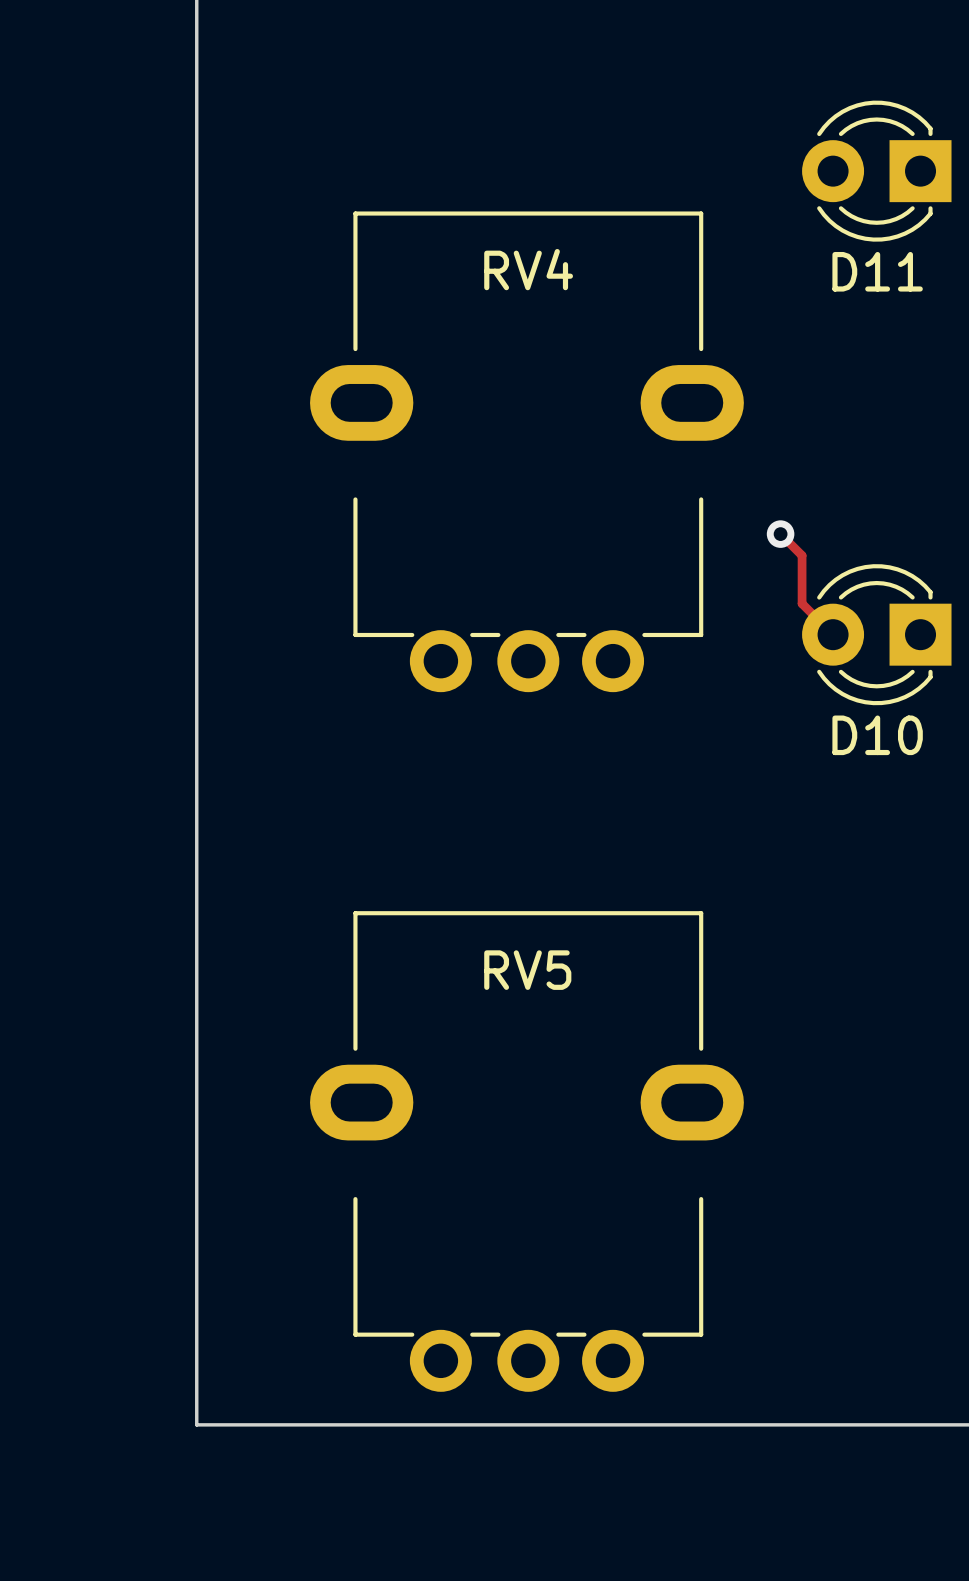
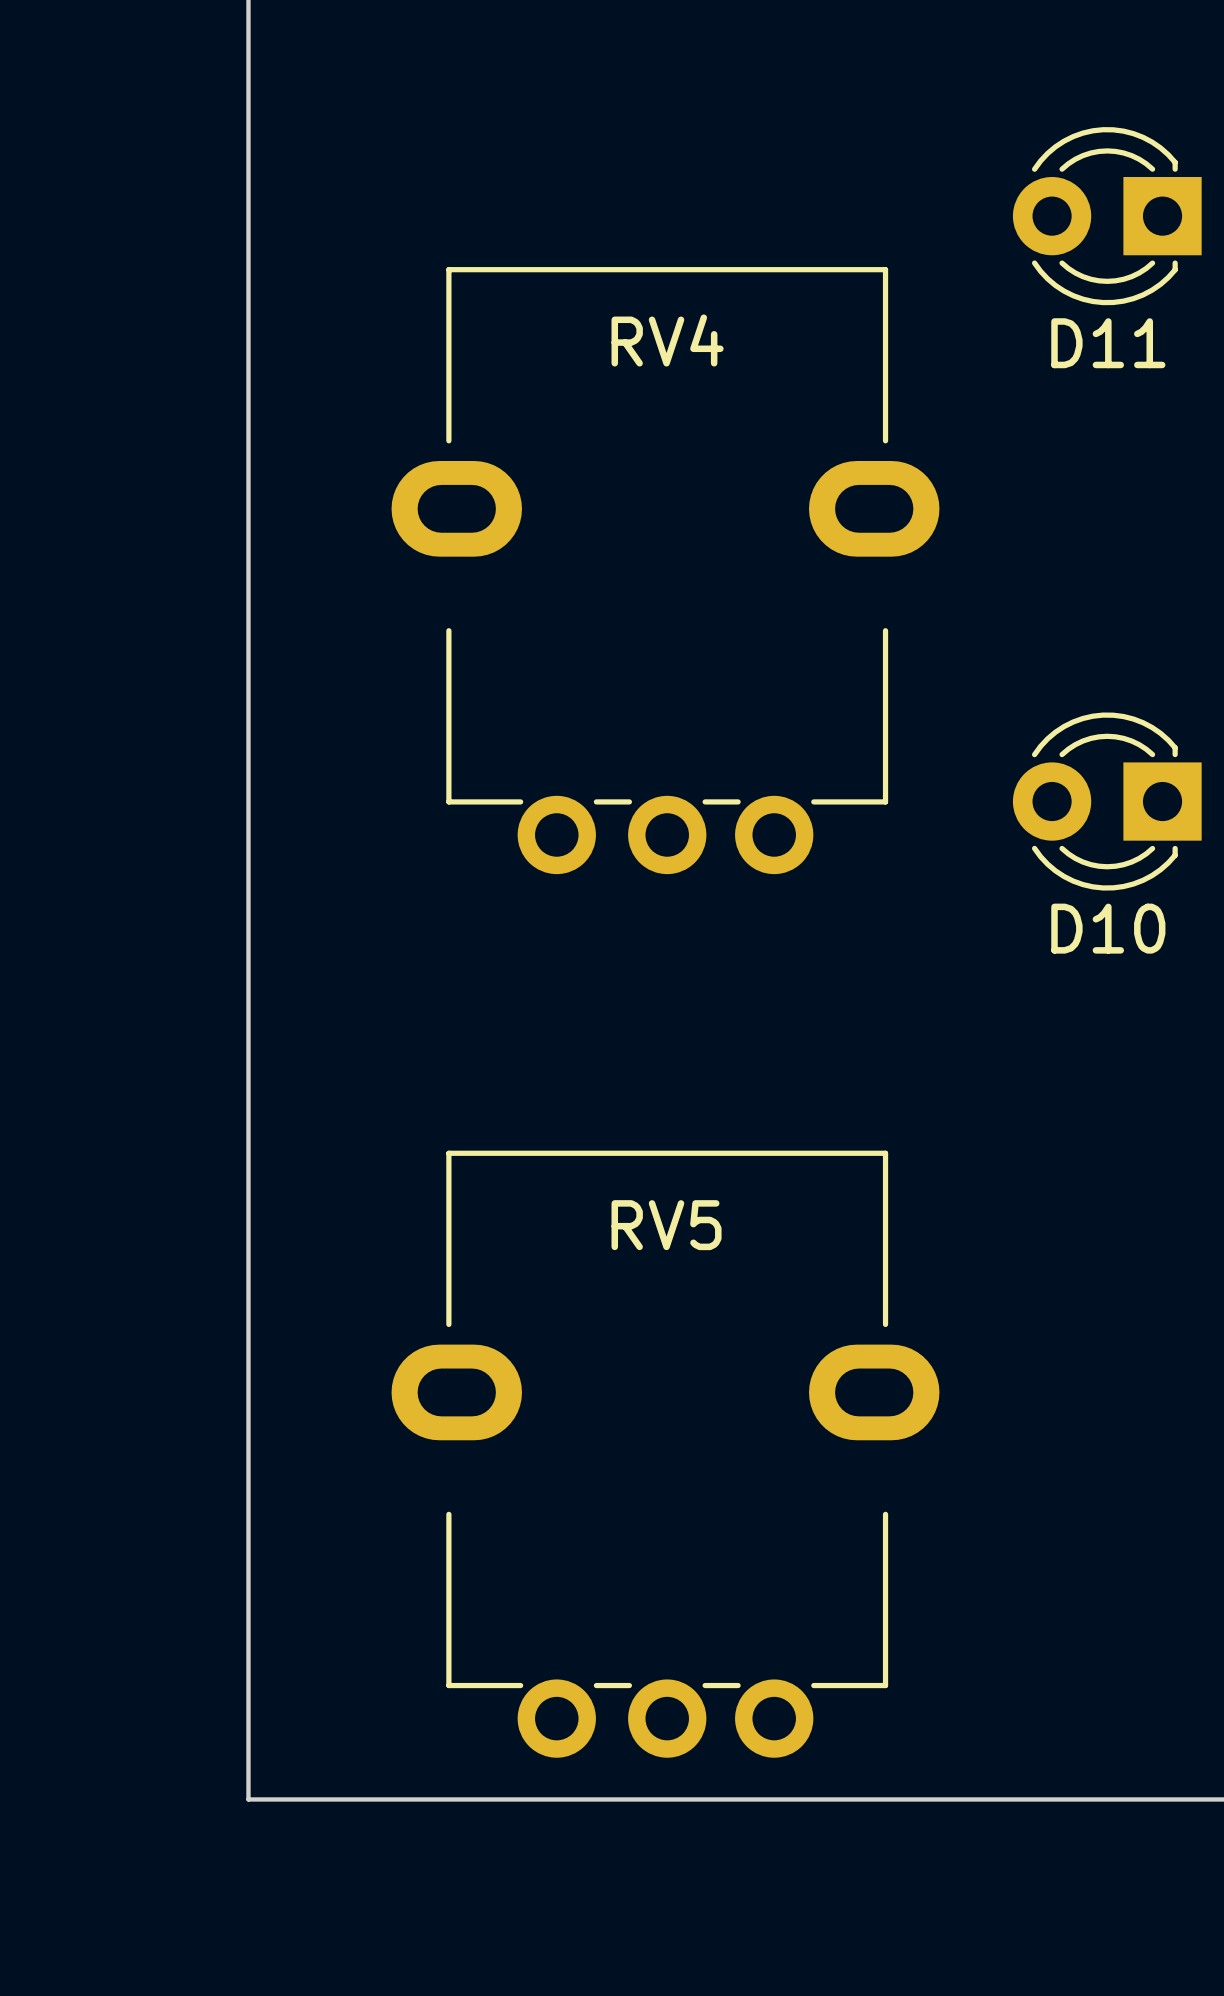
track: (780, 534) (802, 555) (802, 603) (833, 634) -> none
via: (780, 534) -> none

